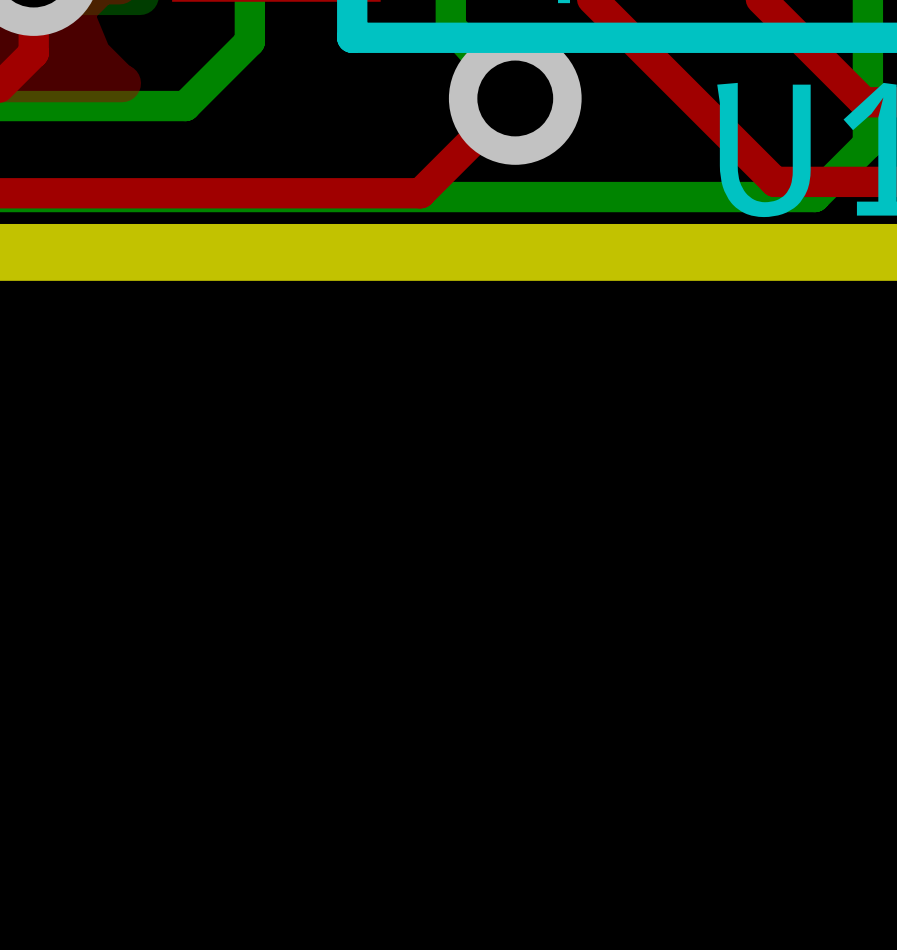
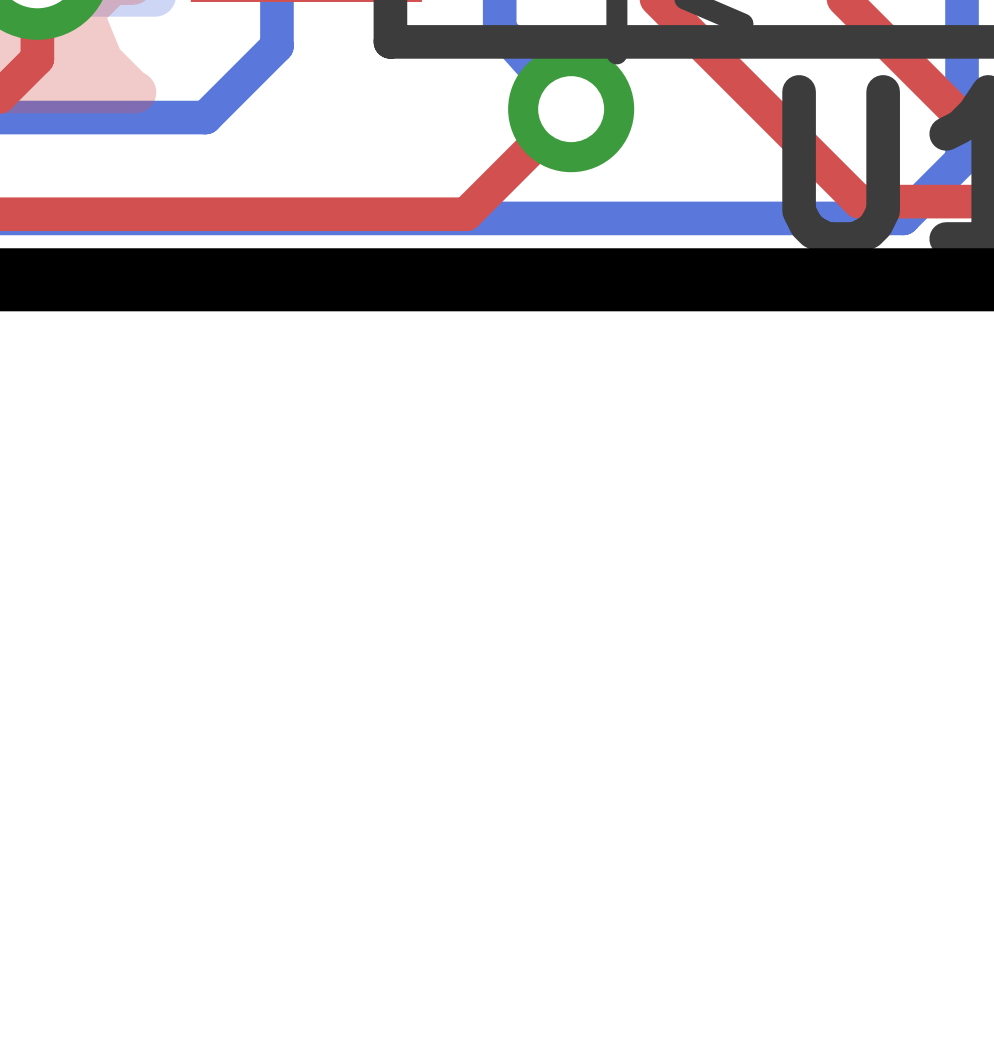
via size: [448, 32, 582, 165] -> [508, 46, 635, 173]

